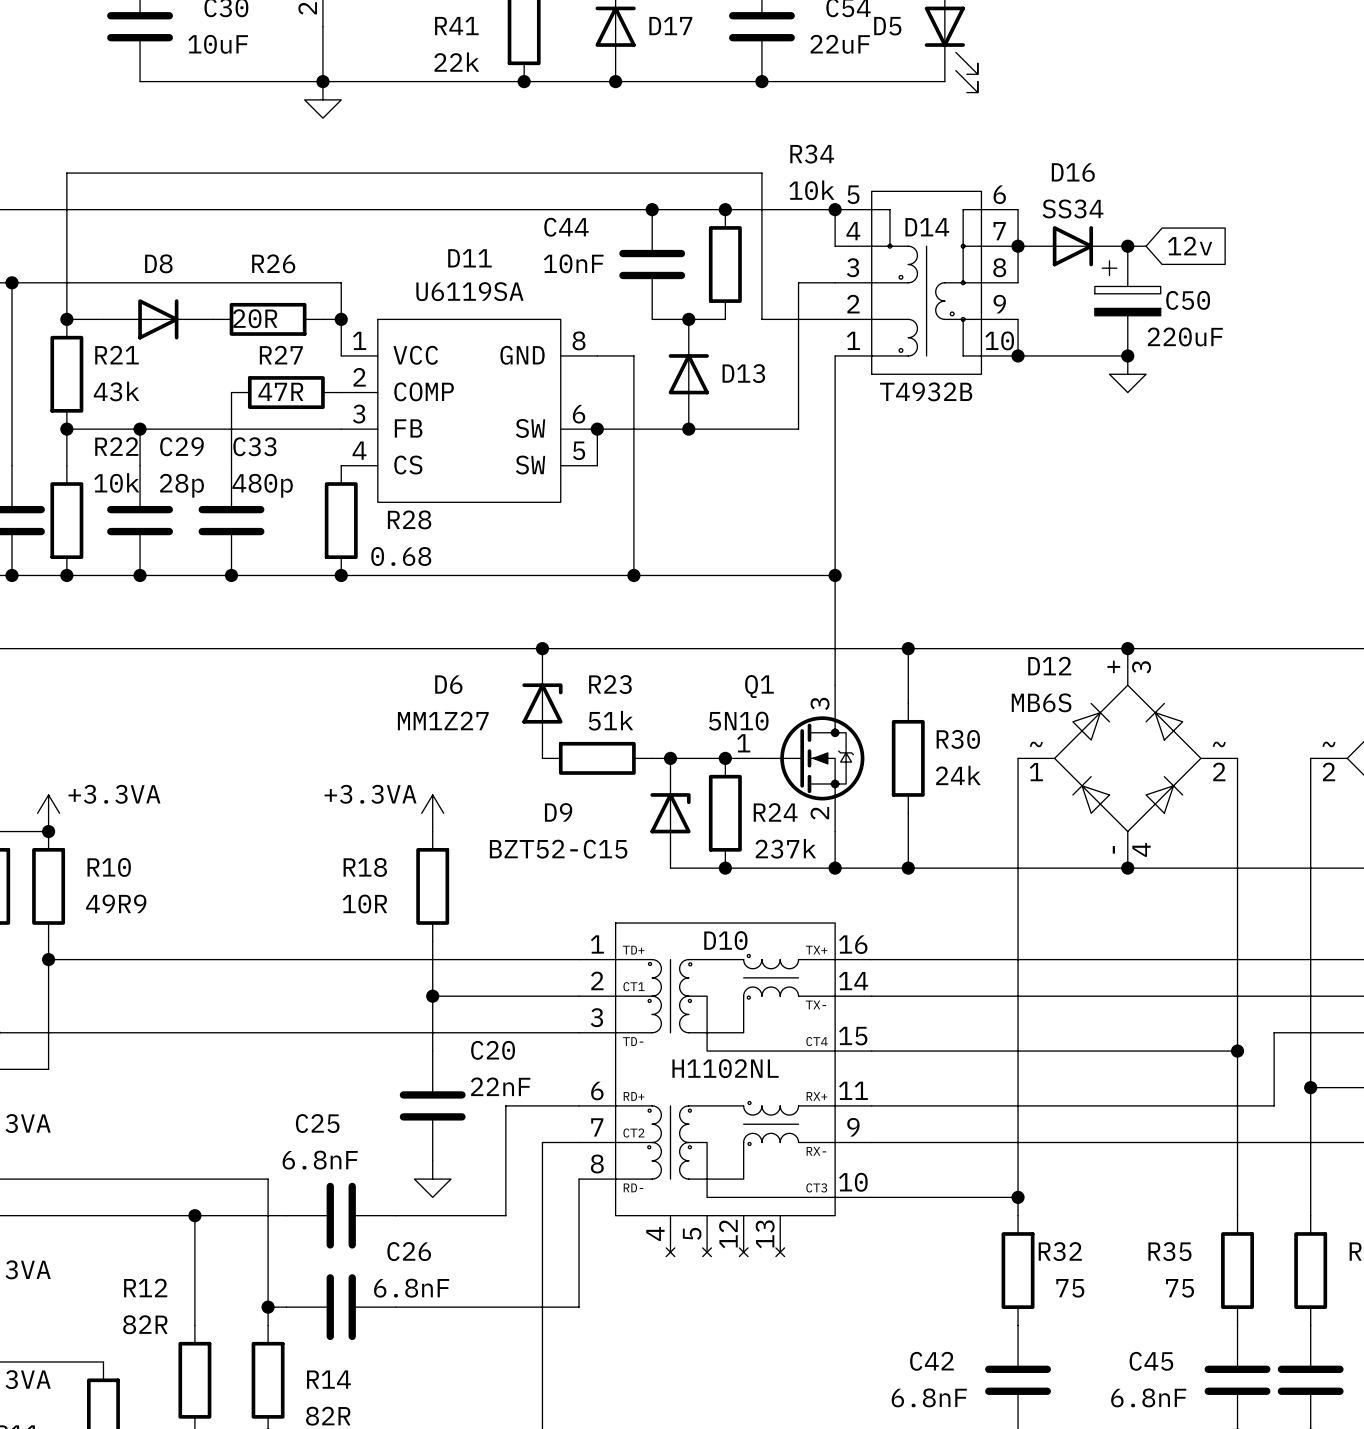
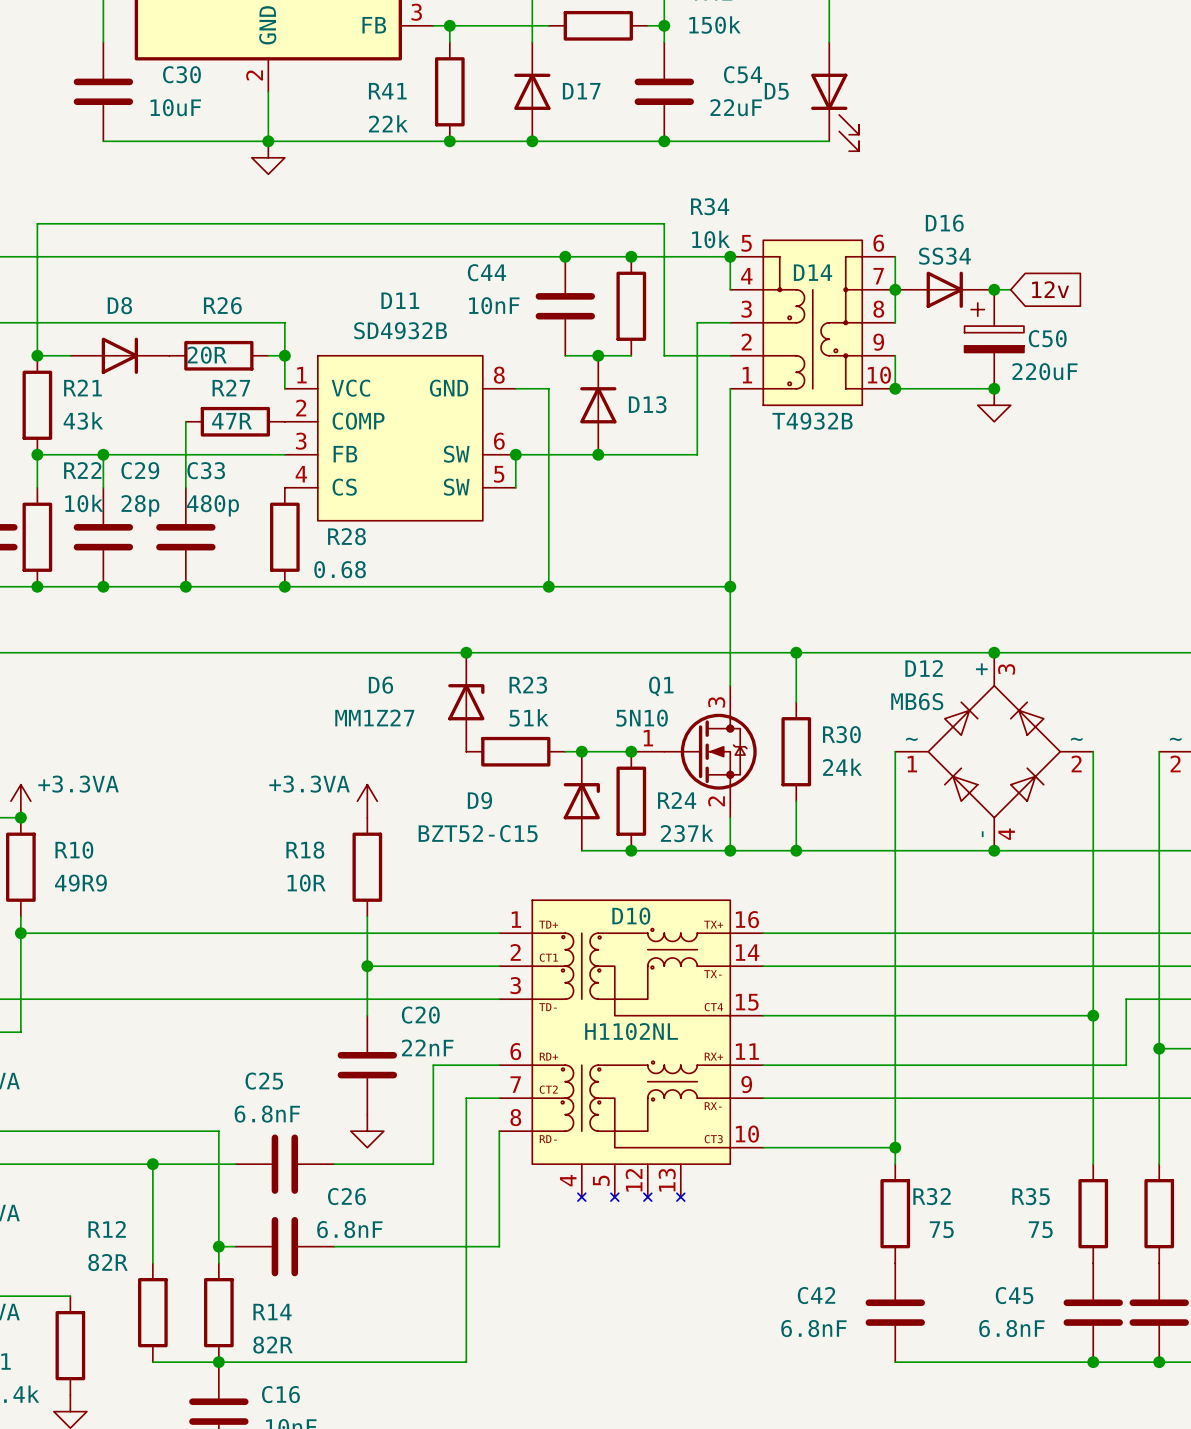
D11 value: U6119SA (469, 291) -> SD4932B (400, 330)

